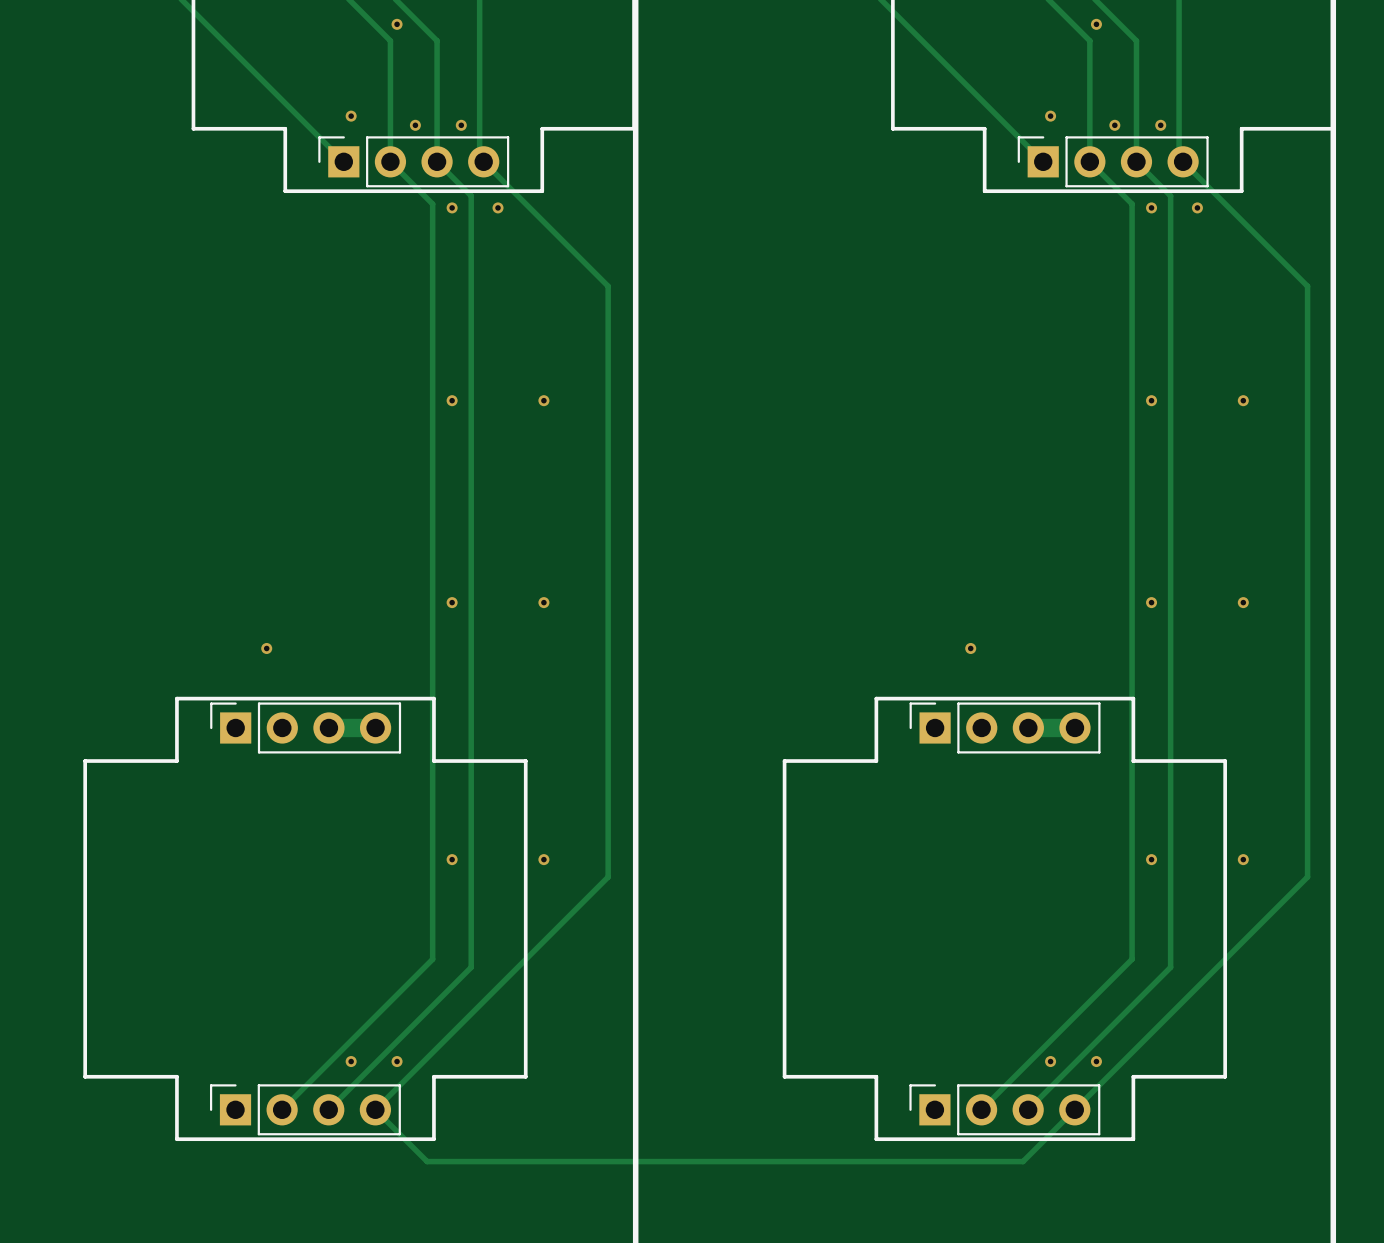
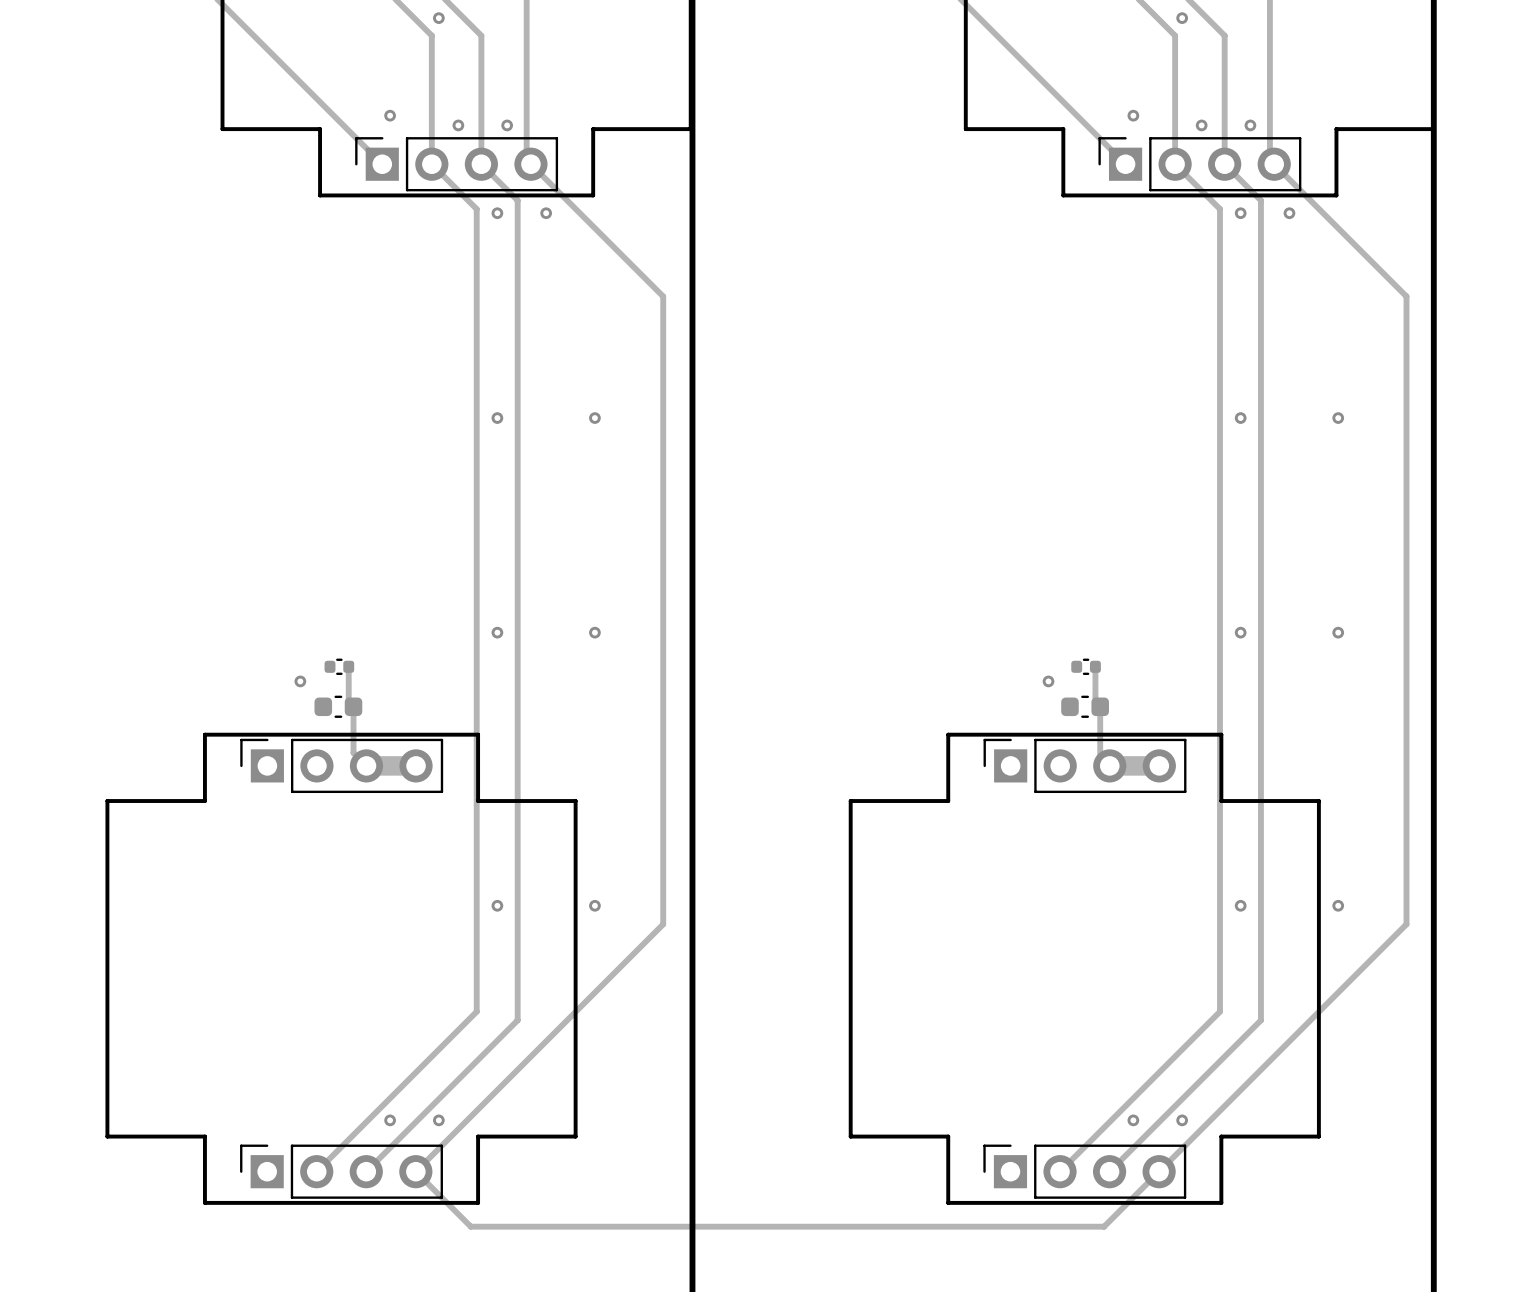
part: none -> (339, 666)
track: none -> (348, 666) (348, 702) (353, 706) (353, 752) (366, 765)
part: none -> (1086, 666)
track: none -> (1095, 666) (1095, 702) (1100, 706) (1100, 756) (1109, 765)
part: none -> (338, 706)
part: none -> (1085, 706)

